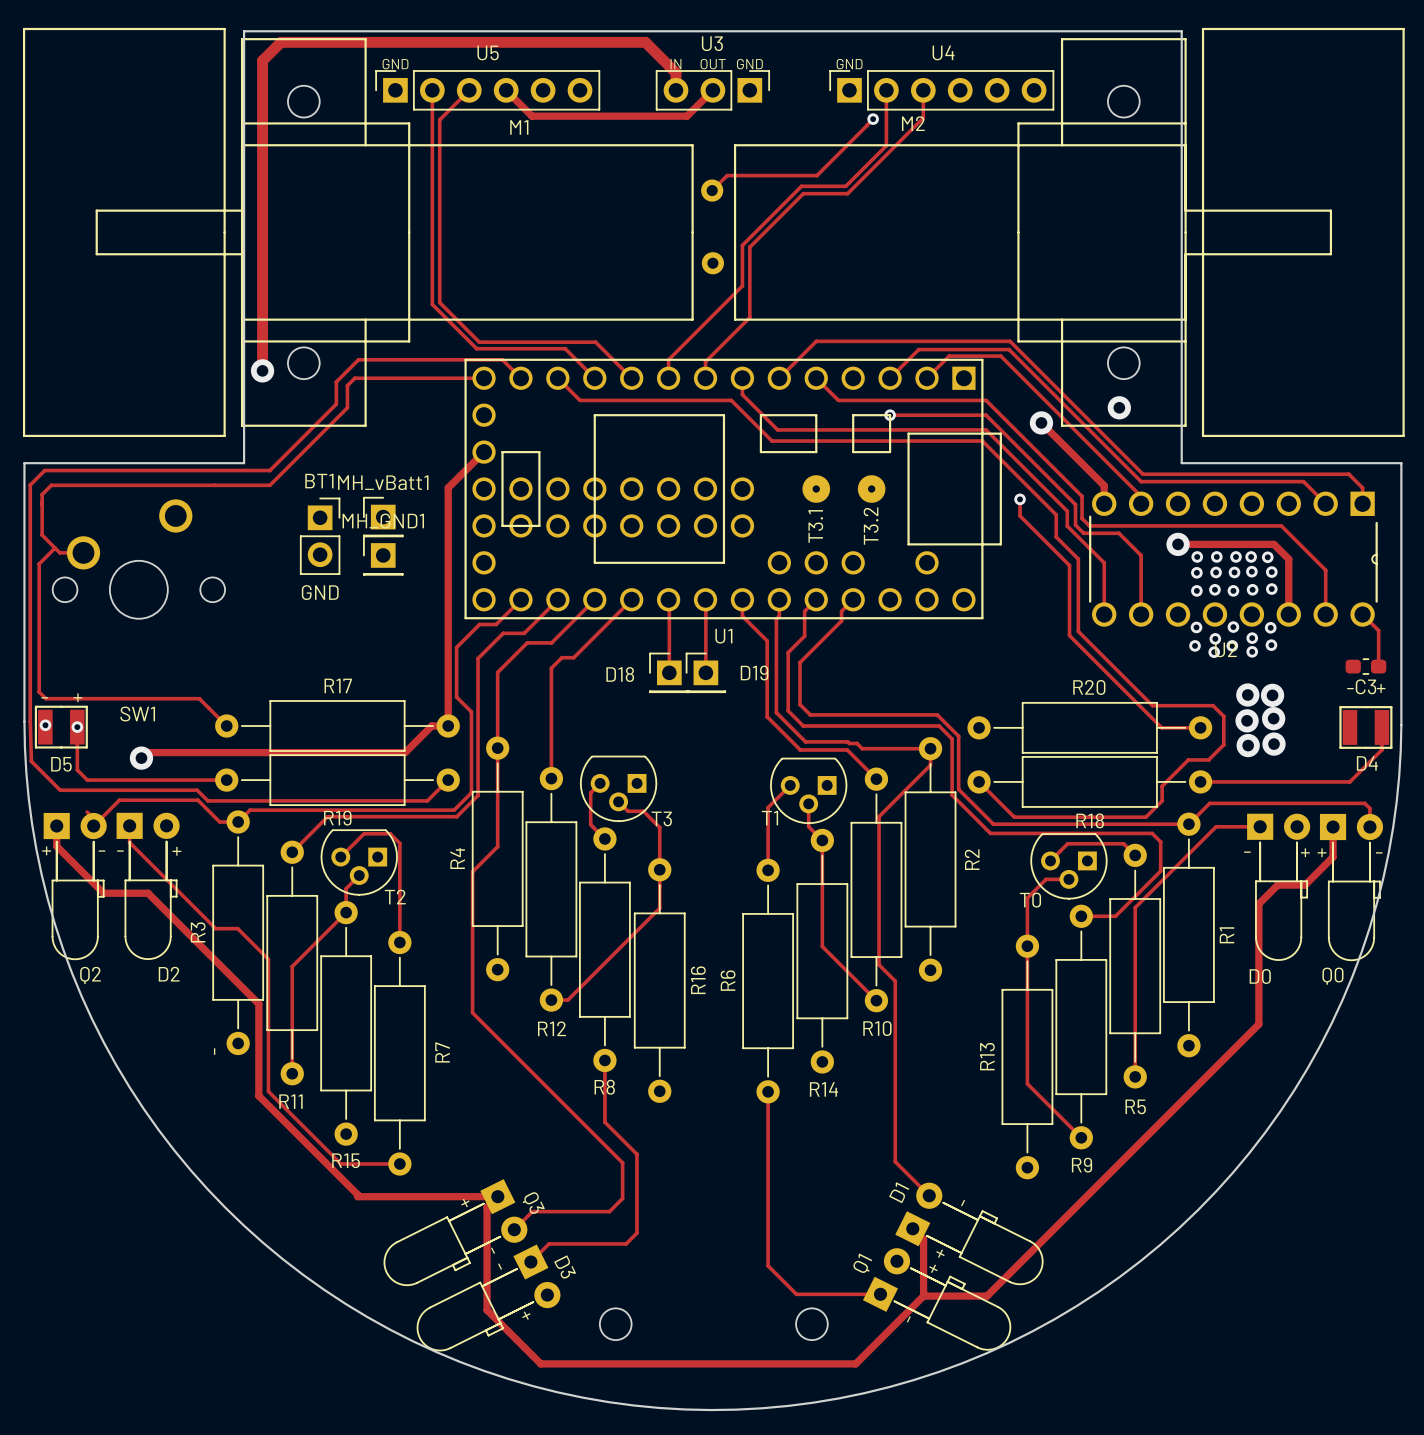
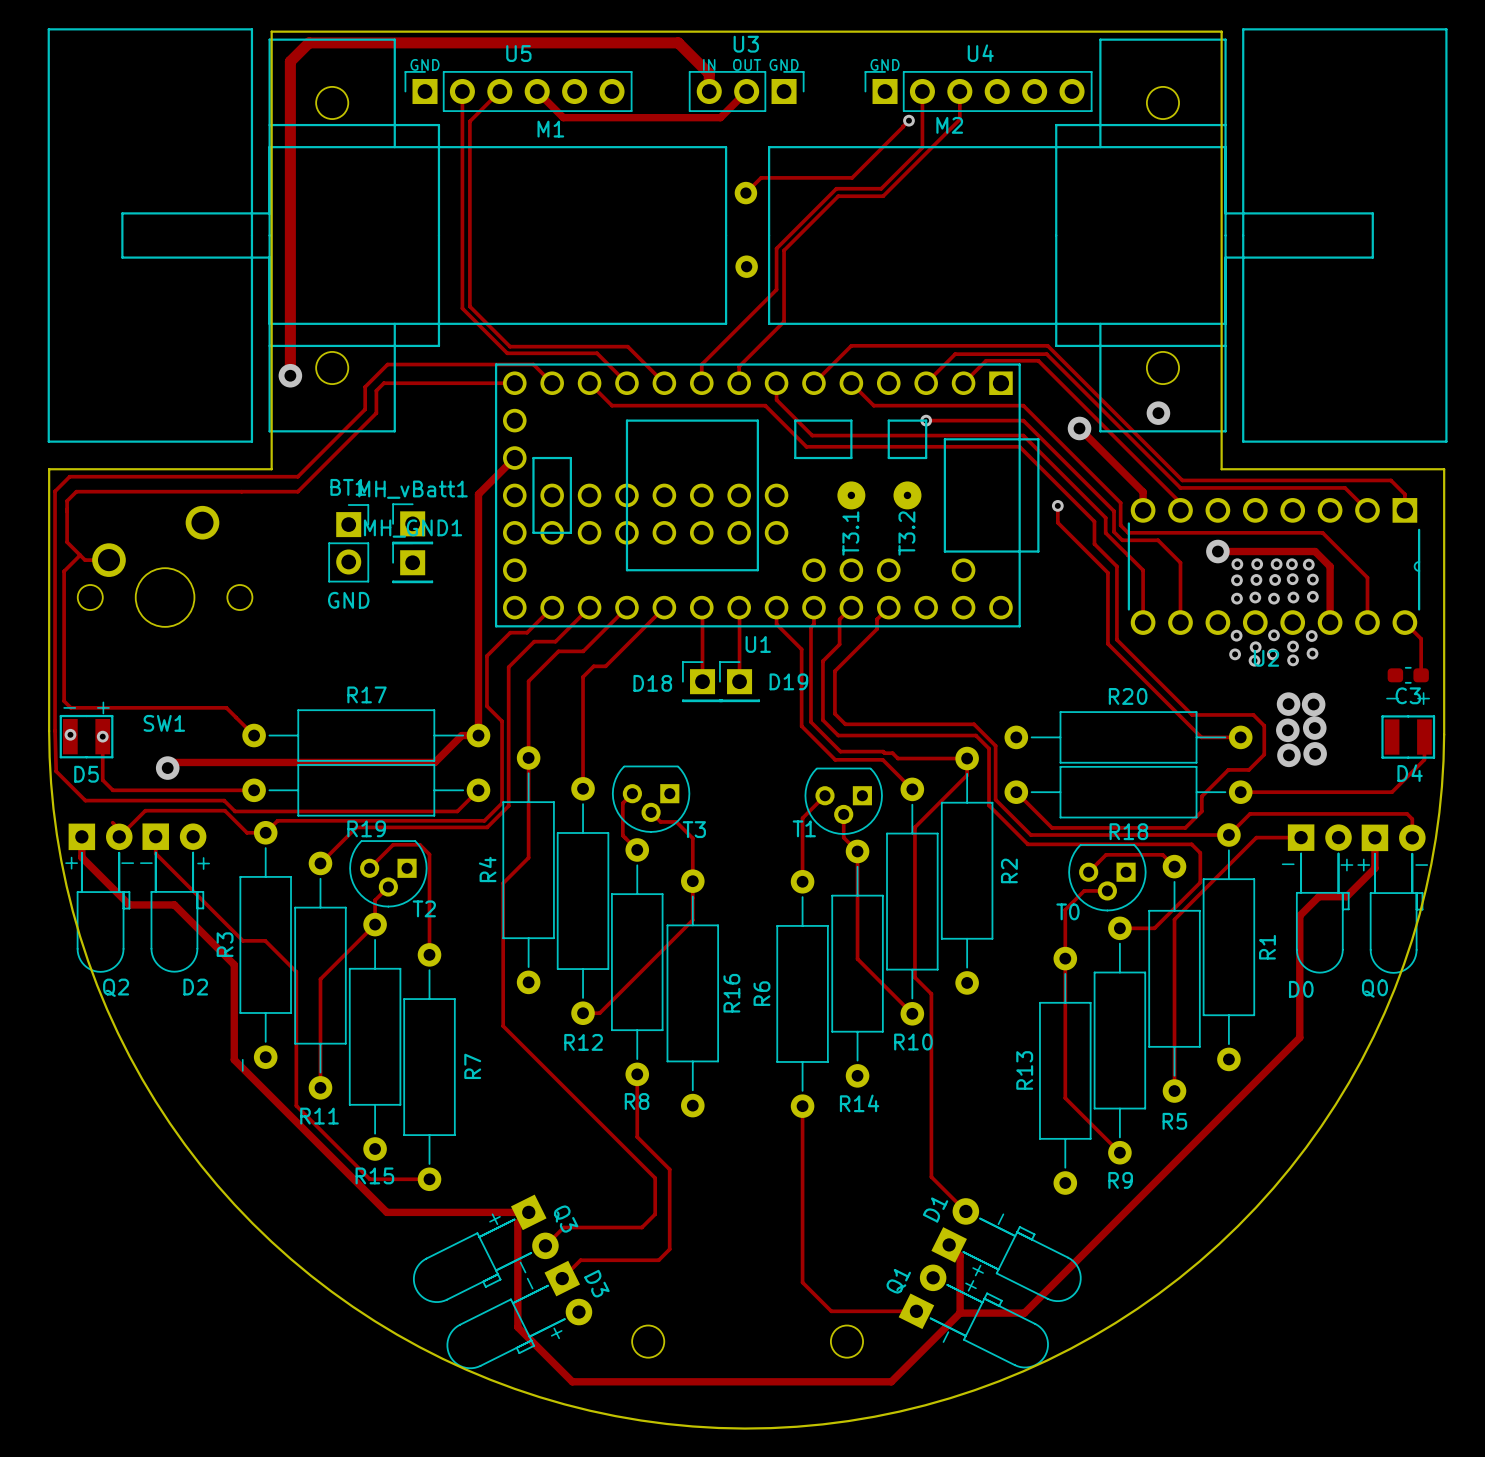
track: (207, 952) (258, 1003) (258, 1095) (357, 1196) -> (234, 964) (234, 1059) (386, 1212)

